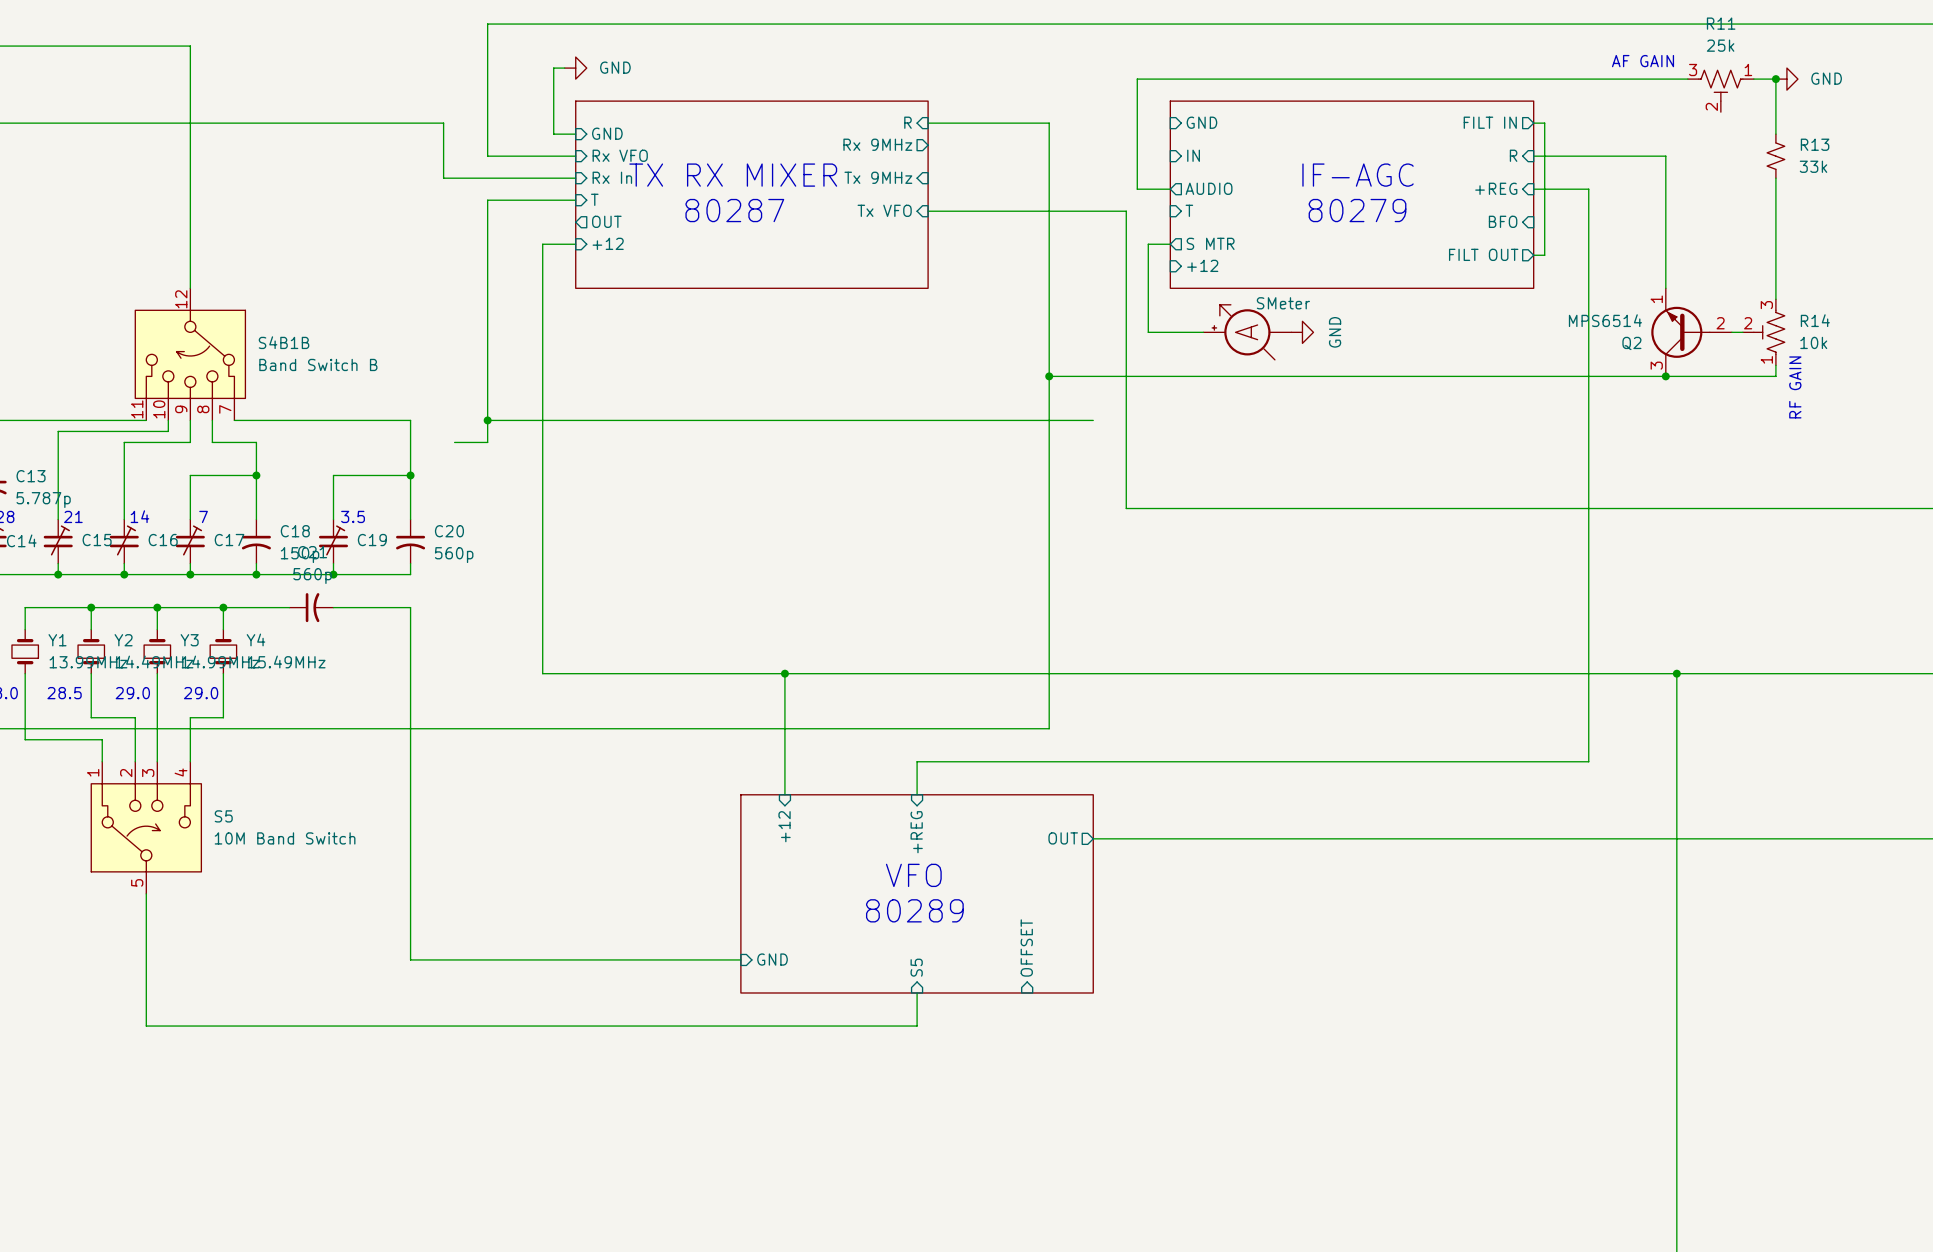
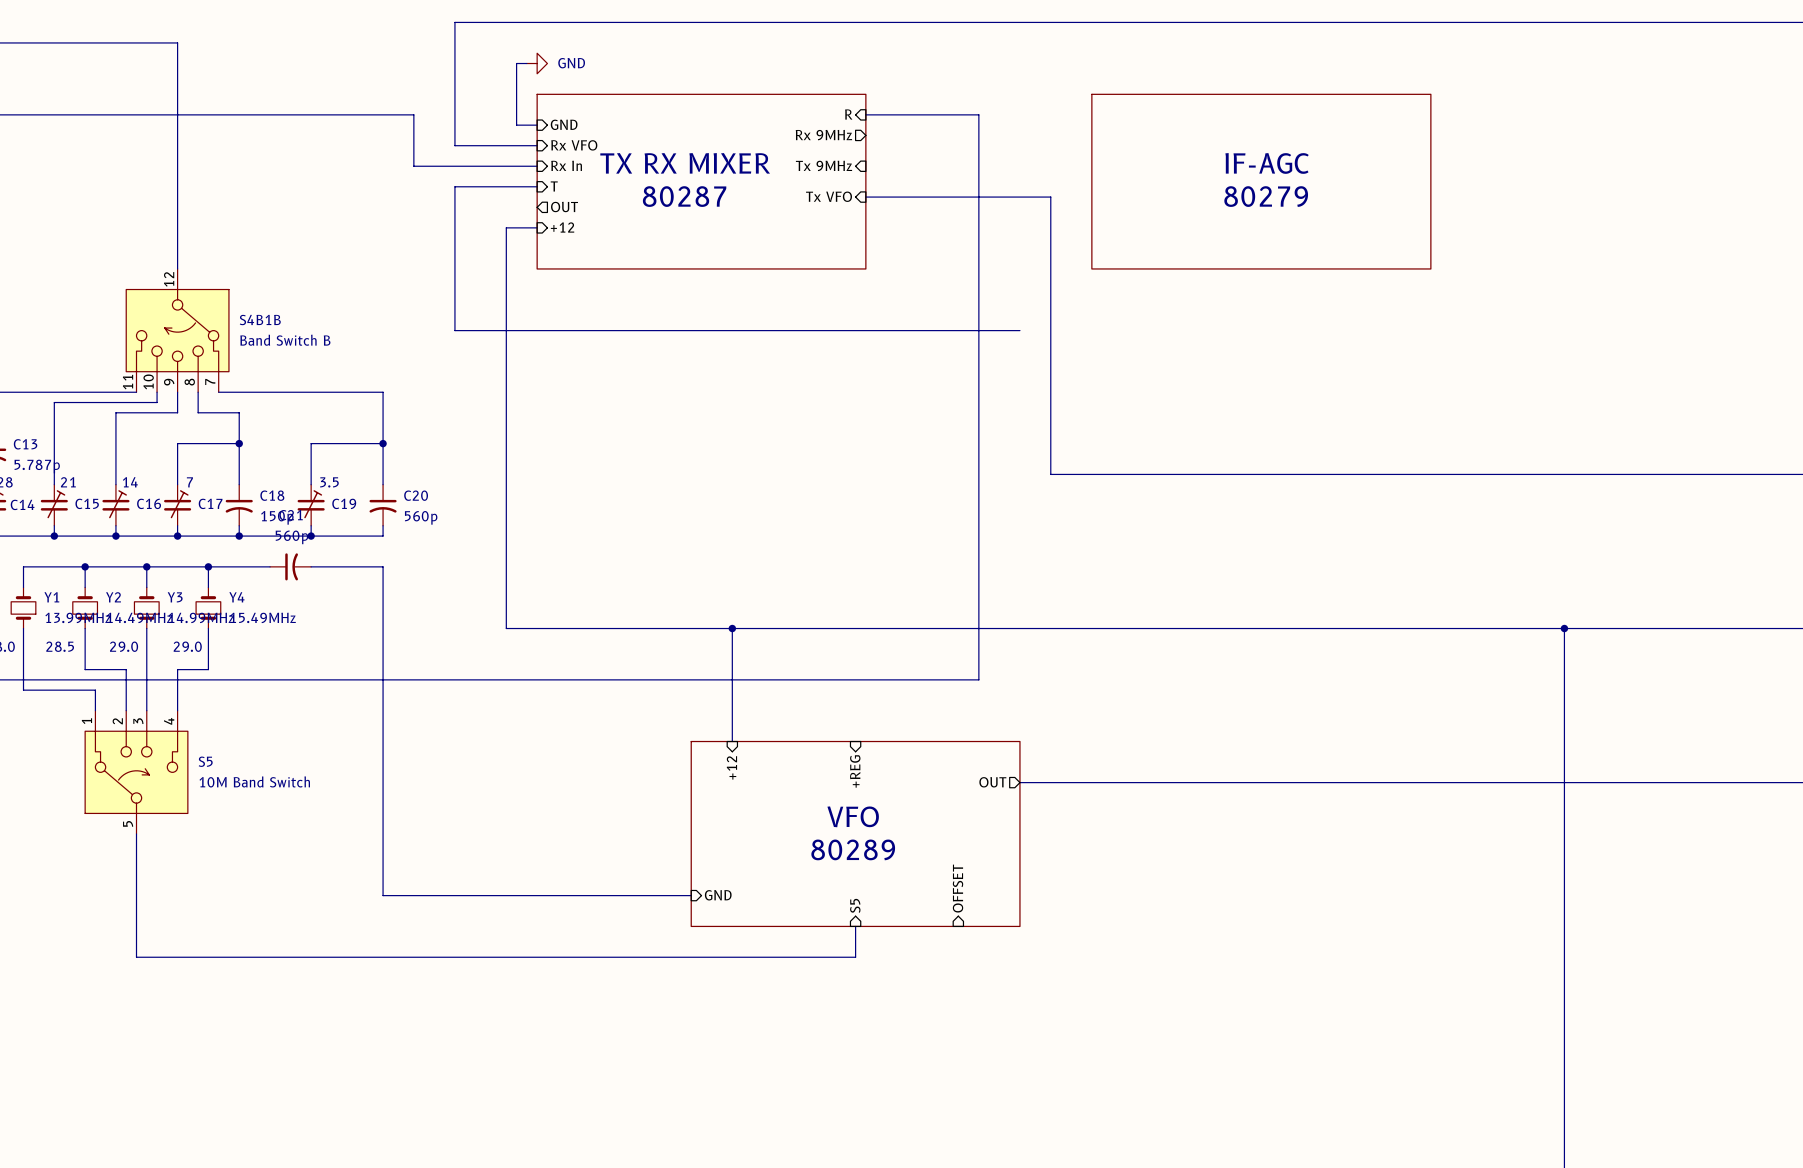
text: AF GAIN (1643, 61) -> none
wire: (1687, 79) (1137, 79) (1137, 189) (1170, 189) -> none
wire: (1753, 79) (1775, 79) (1775, 134) -> none
junction: (1775, 79) -> none
power symbol: GND (1786, 79) -> none
R11: 25k (1720, 91) -> none
sheet pin: GND (1201, 122) -> none
sheet pin: FILT IN (1490, 122) -> none
wire: (1533, 123) (1544, 123) (1544, 255) (1533, 255) -> none
sheet pin: IN (1193, 155) -> none
sheet pin: R (1513, 155) -> none
wire: (1533, 156) (1665, 156) (1665, 288) -> none
R13: 33k (1775, 156) -> none
wire: (1775, 178) (1775, 299) -> none
sheet pin: AUDIO (1209, 188) -> none
sheet pin: +REG (1496, 188) -> none
wire: (1533, 189) (1588, 189) (1588, 761) (917, 761) (917, 794) -> none
sheet pin: T (1189, 210) -> none
sheet pin: BFO (1503, 221) -> none
sheet pin: S MTR (1210, 243) -> none
wire: (1170, 244) (1148, 244) (1148, 332) (1203, 332) -> none
sheet pin: FILT OUT (1483, 254) -> none
sheet pin: +12 (1202, 265) -> none
part: SMeter (1247, 332) -> none
power symbol: GND (1302, 332) -> none
Q2: MPS6514 (1691, 332) -> none
wire: (1731, 332) (1742, 332) -> none
R14: 10k (1763, 332) -> none
wire: (487, 354) (487, 442) (454, 442) -> (454, 330) (1019, 330)
wire: (1775, 365) (1775, 376) (1049, 376) -> none
junction: (1049, 376) -> none
junction: (1665, 376) -> none
text: RF GAIN (1795, 387) -> none
wire: (487, 420) (1093, 420) -> none
junction: (487, 420) -> none

